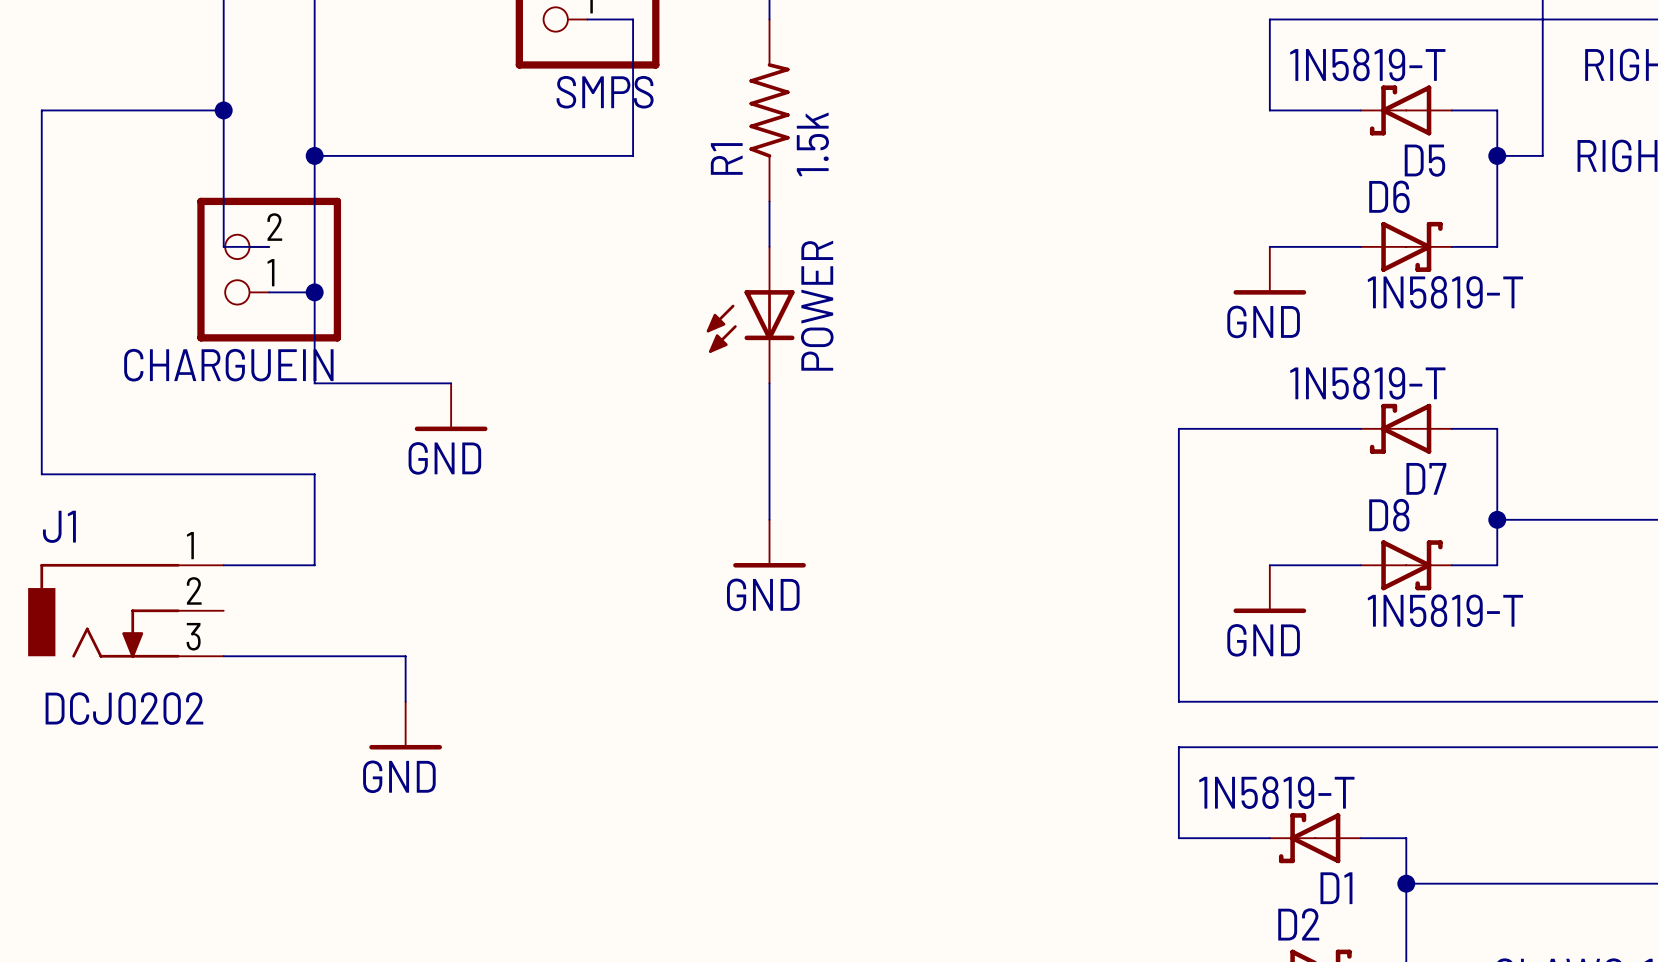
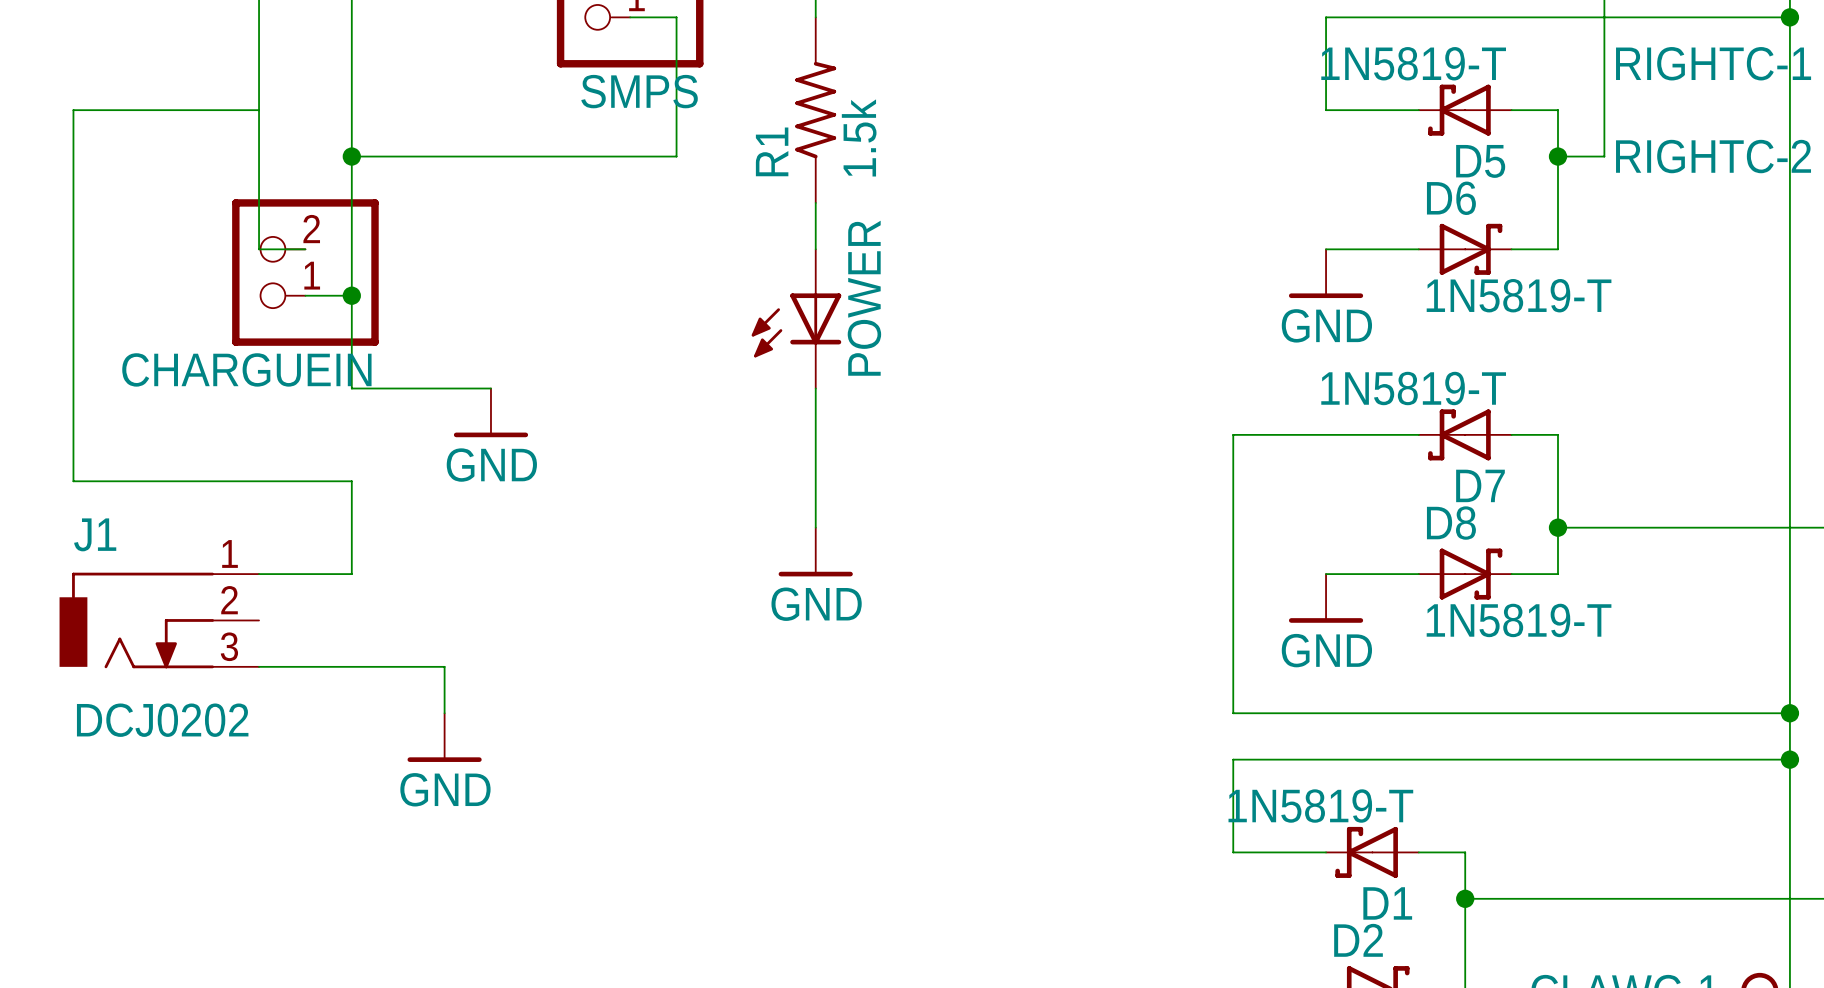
junction: (223, 110) -> none

